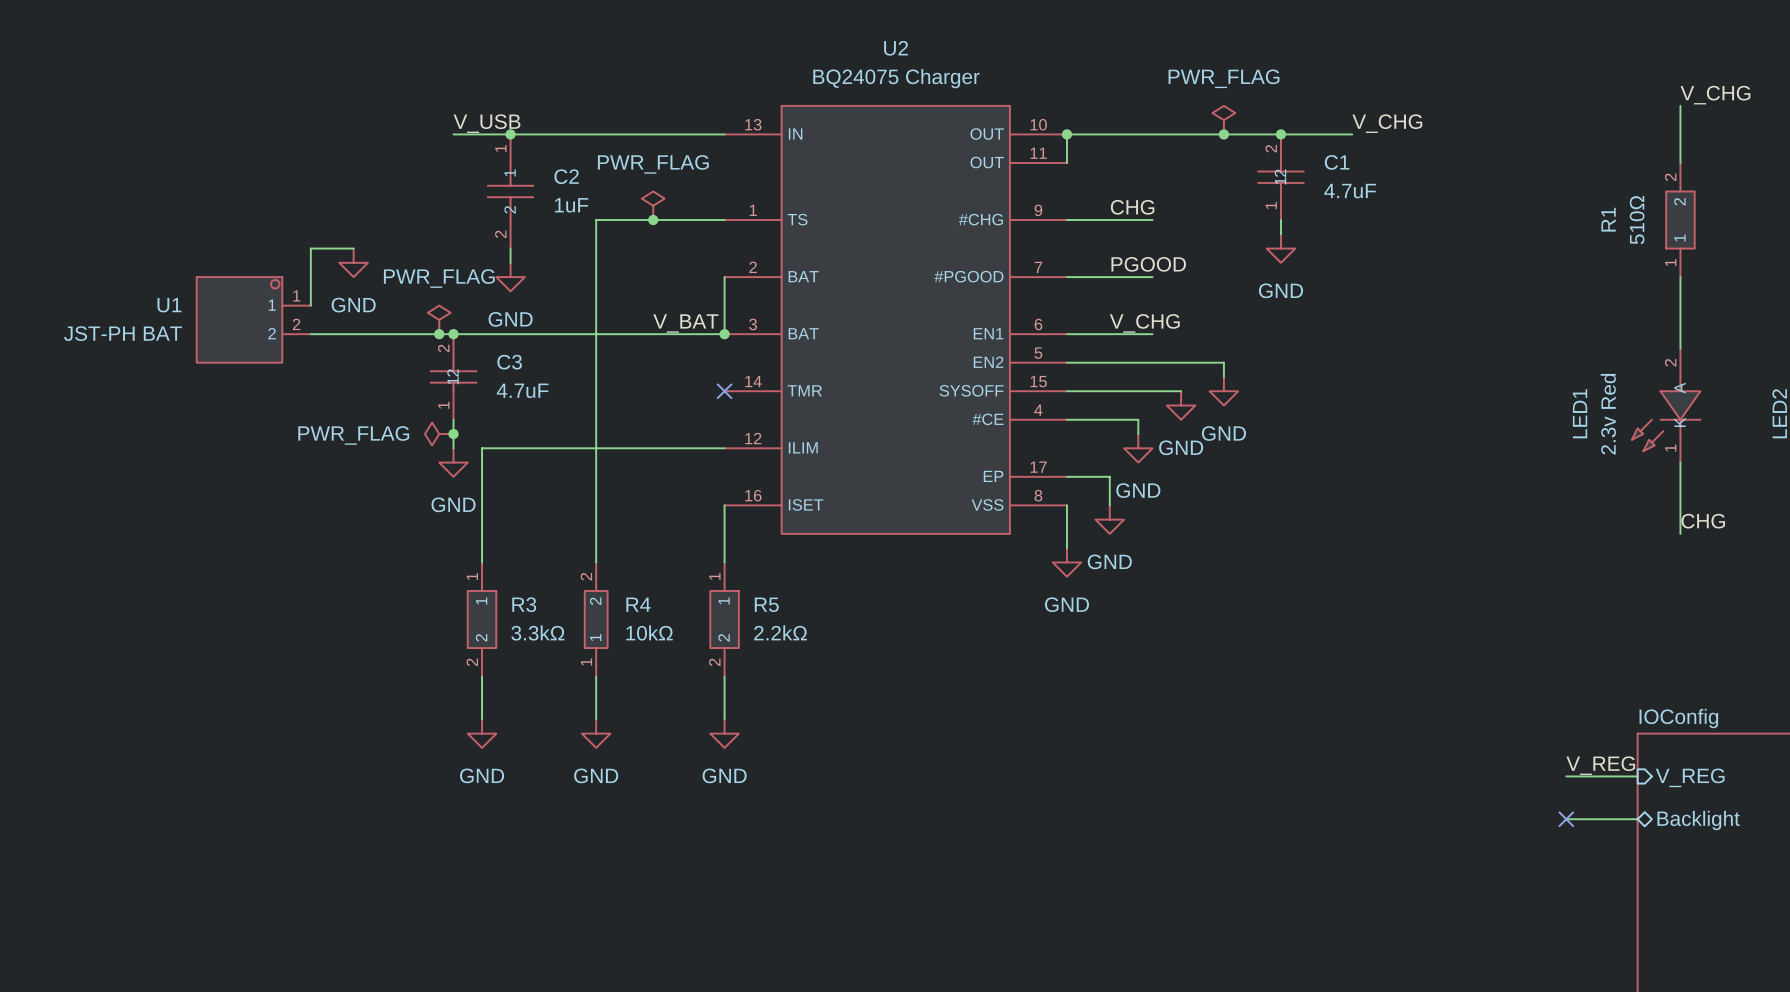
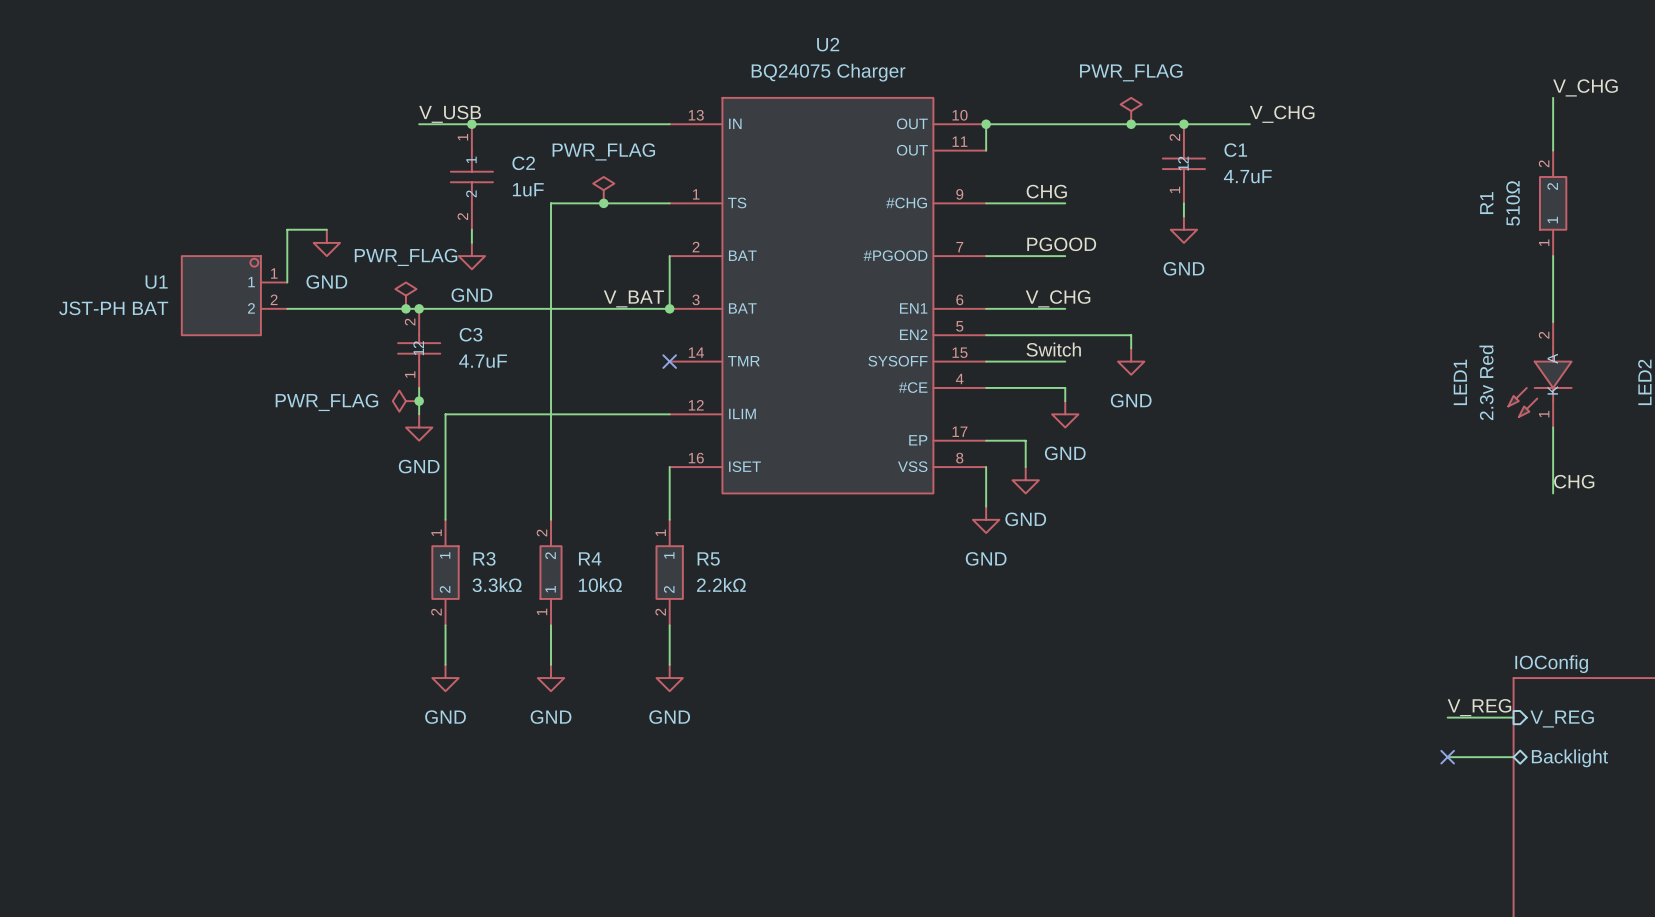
label: none -> Switch (1053, 349)
wire: (1152, 391) (1181, 391) -> none
power symbol: GND (1181, 405) -> none
wire: (1138, 419) (1138, 434) -> (1052, 387) (1065, 387) (1065, 401)
power symbol position: GND (1138, 448) -> GND (1065, 414)

